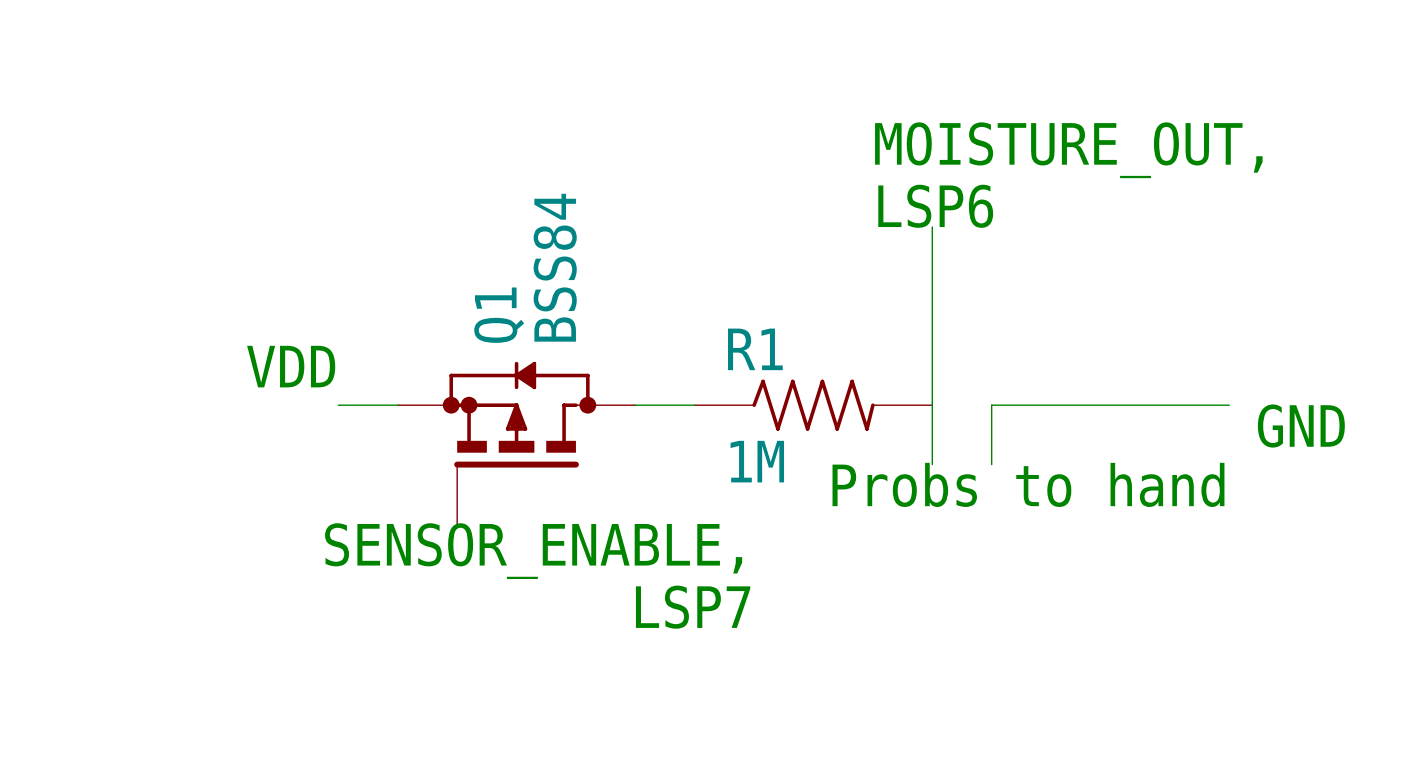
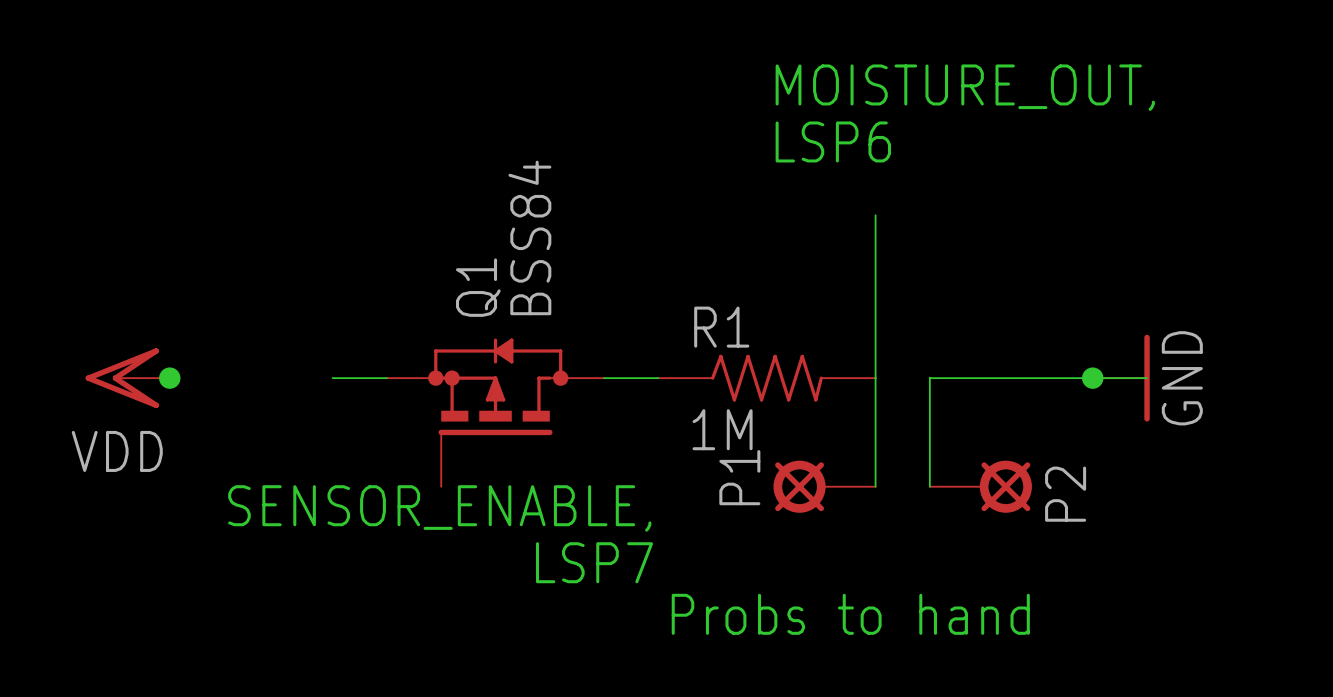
text position: MOISTURE_OUT, (1068, 150) -> MOISTURE_OUT, (965, 87)
text position: LSP6 (935, 206) -> LSP6 (833, 141)
text: VDD (291, 366) -> none
power symbol: none -> VDD (127, 378)
junction: none -> (169, 378)
junction: none -> (1092, 378)
power symbol: none -> GND (1121, 378)
text: GND (1301, 426) -> none
wire: none -> (875, 432) (875, 486)
wire: none -> (929, 432) (929, 486)
text position: Probs to hand (1028, 484) -> Probs to hand (850, 614)
P1: none -> (824, 486)
P2: none -> (980, 486)
text position: SENSOR_ENABLE, (533, 551) -> SENSOR_ENABLE, (439, 508)
text position: LSP7 (693, 607) -> LSP7 (594, 562)

